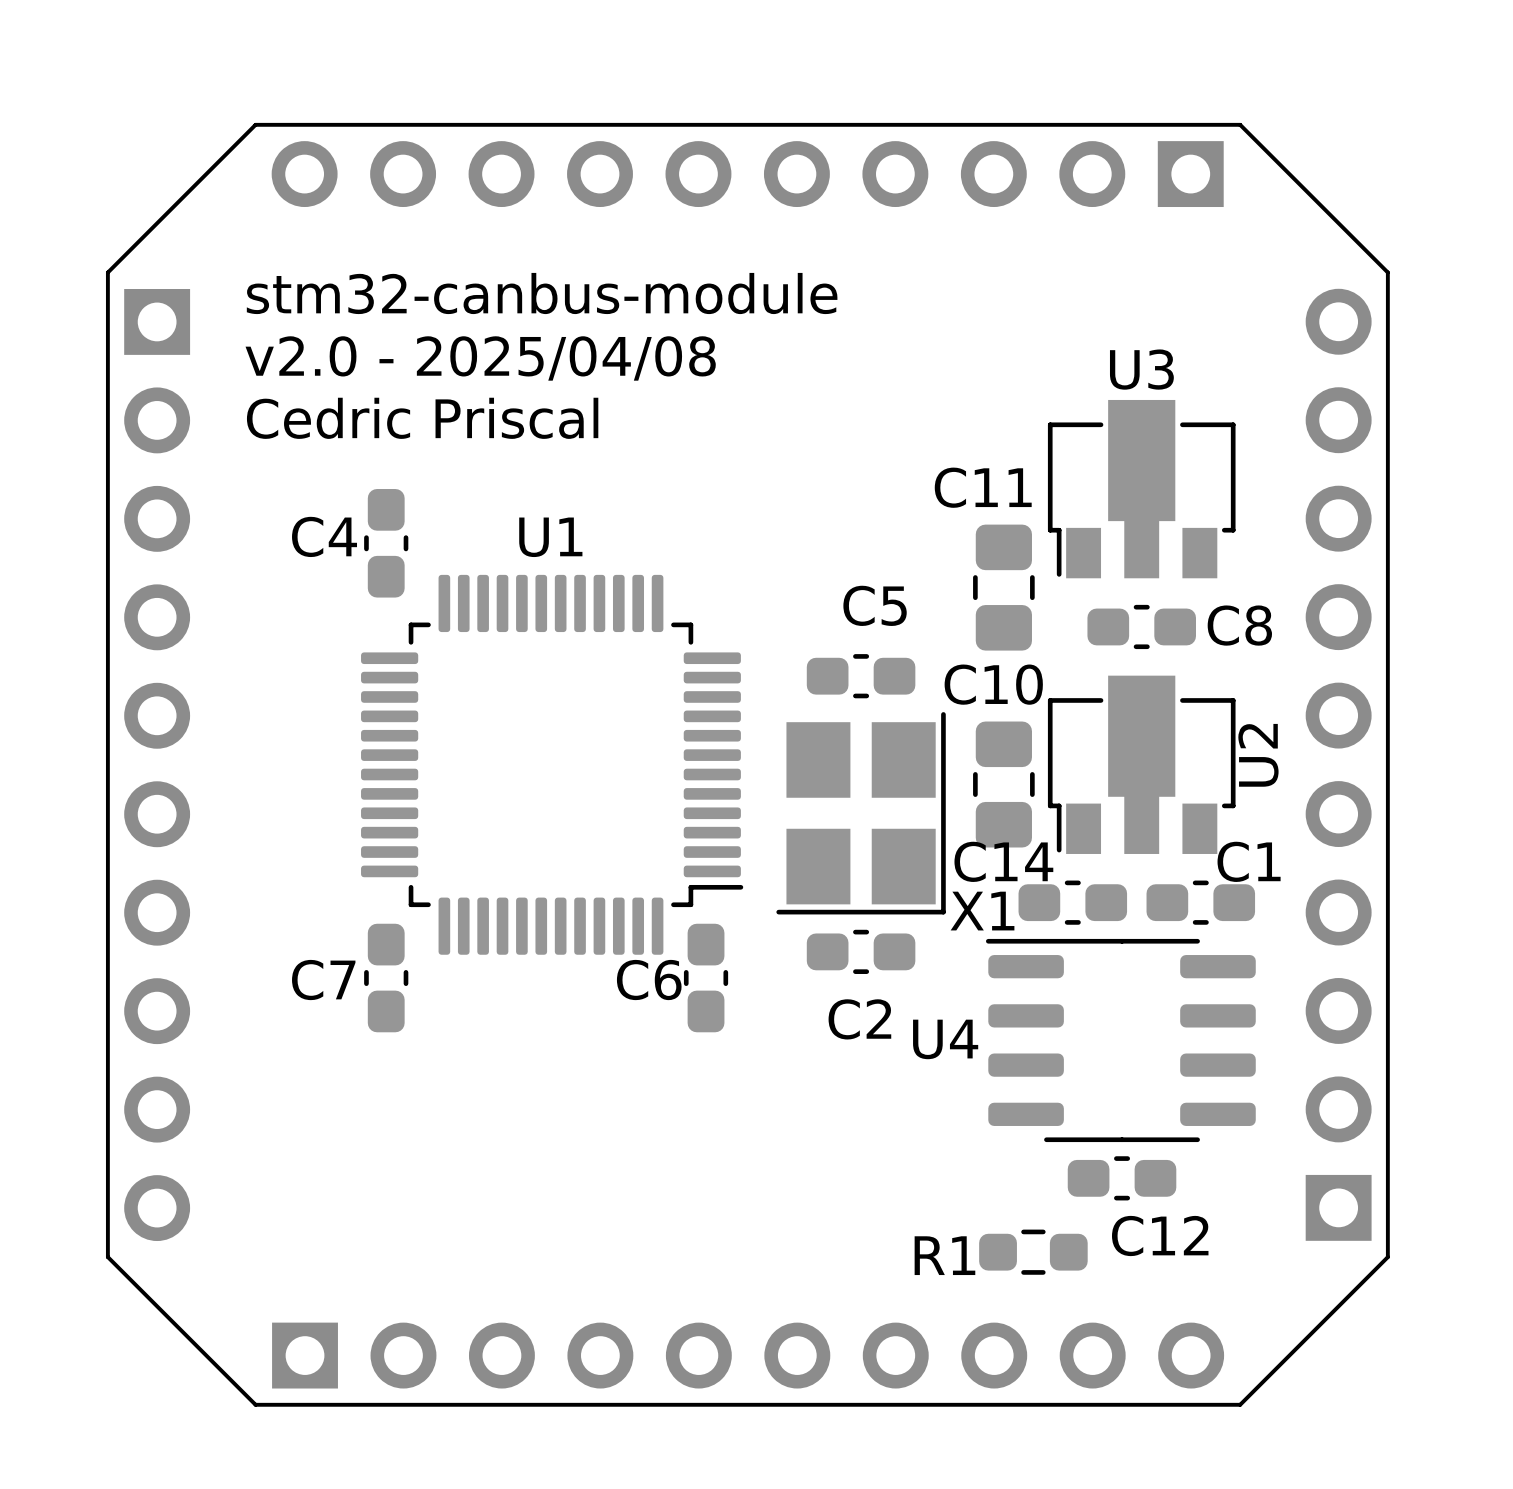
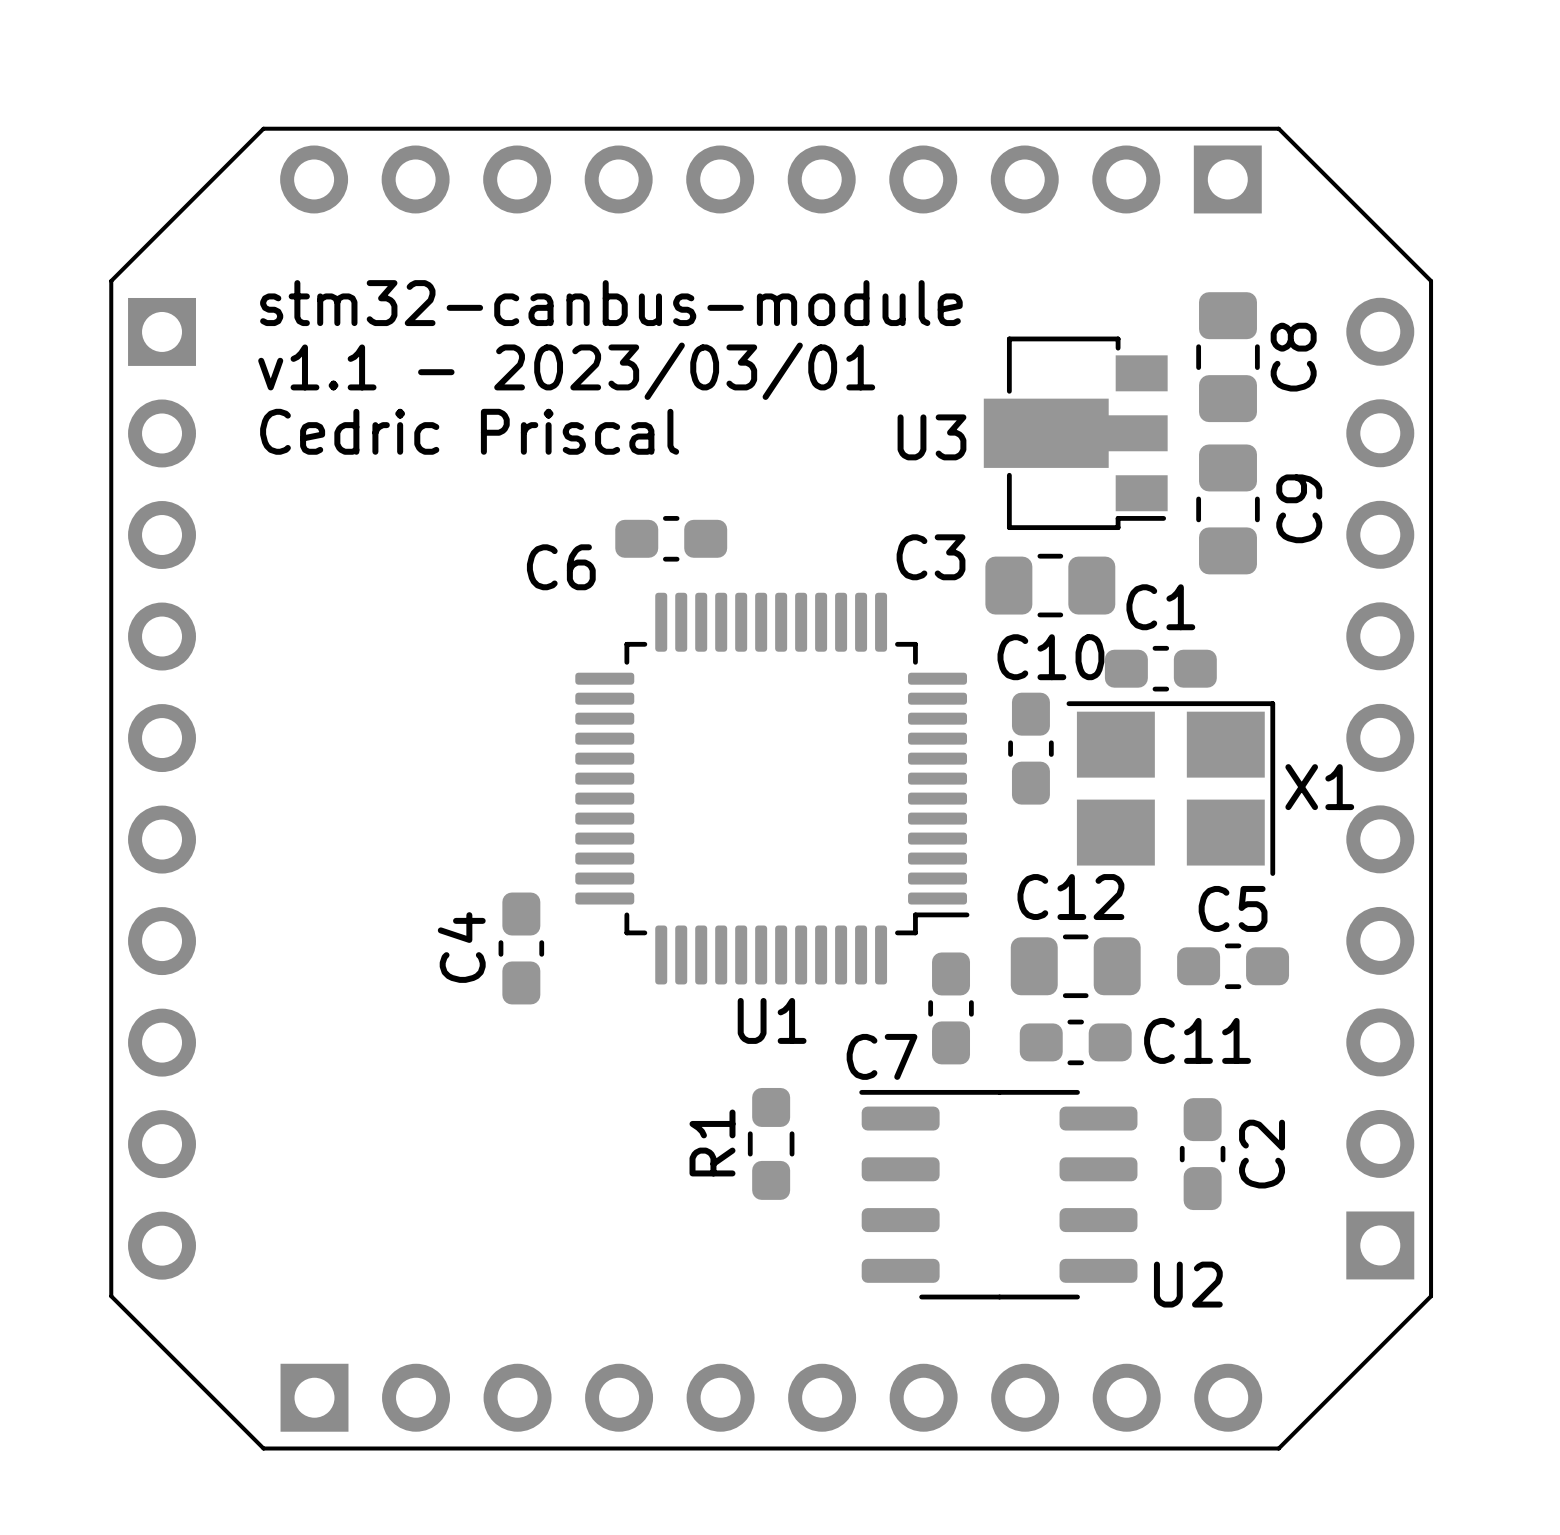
text: v2.0 - 2025/04/08 (480, 358) -> v1.1 - 2023/03/01 (566, 371)
C11 name position: C11 (983, 487) -> C11 (1197, 1040)
U3 rotation: 0° (1141, 489) -> 90° counterclockwise (1075, 433)
U3 position: (1141, 489) -> (1075, 433)
C9: none -> (1228, 509)
C11 footprint: [973, 524, 1035, 651] -> [1019, 1019, 1132, 1066]
C4 name rotation: 0° (324, 536) -> 90° counterclockwise (461, 947)
U1 name position: U1 (550, 537) -> U1 (772, 1020)
C4 position: (386, 543) -> (521, 948)
C3: none -> (1050, 585)
C8 footprint: [1087, 604, 1196, 650] -> [1196, 292, 1260, 423]
C5 name position: C5 (875, 605) -> C5 (1233, 908)
U2 footprint: [1047, 675, 1236, 854] -> [859, 1089, 1138, 1300]
C5 position: (861, 676) -> (1233, 966)
C10 footprint: [973, 721, 1035, 848] -> [1008, 692, 1054, 805]
U2 name position: U2 (1258, 755) -> U2 (1188, 1284)
U1 position: (552, 764) -> (772, 788)
X1 rotation: 0° (861, 813) -> 90° counterclockwise (1170, 788)
X1 position: (861, 813) -> (1170, 788)
C1 name position: C1 (1249, 861) -> C1 (1160, 607)
C14: (1072, 902) -> none
C1 position: (1200, 902) -> (1160, 668)
X1 name position: X1 (982, 911) -> X1 (1319, 787)
C2 rotation: 0° (861, 951) -> 90° clockwise (1202, 1154)
C2 position: (861, 951) -> (1202, 1154)
C7 position: (386, 978) -> (951, 1008)
C6 rotation: 0° (706, 978) -> 90° clockwise (671, 538)
C6 position: (706, 978) -> (671, 538)
C7 name position: C7 (323, 980) -> C7 (882, 1056)
C2 name position: C2 (859, 1019) -> C2 (1262, 1154)
U4: (1120, 1040) -> none
C12 footprint: [1067, 1156, 1177, 1201] -> [1010, 934, 1141, 999]
C12 name position: C12 (1160, 1235) -> C12 (1070, 897)
R1 rotation: 0° (1033, 1252) -> 90° clockwise (771, 1143)
R1 position: (1033, 1252) -> (771, 1143)

